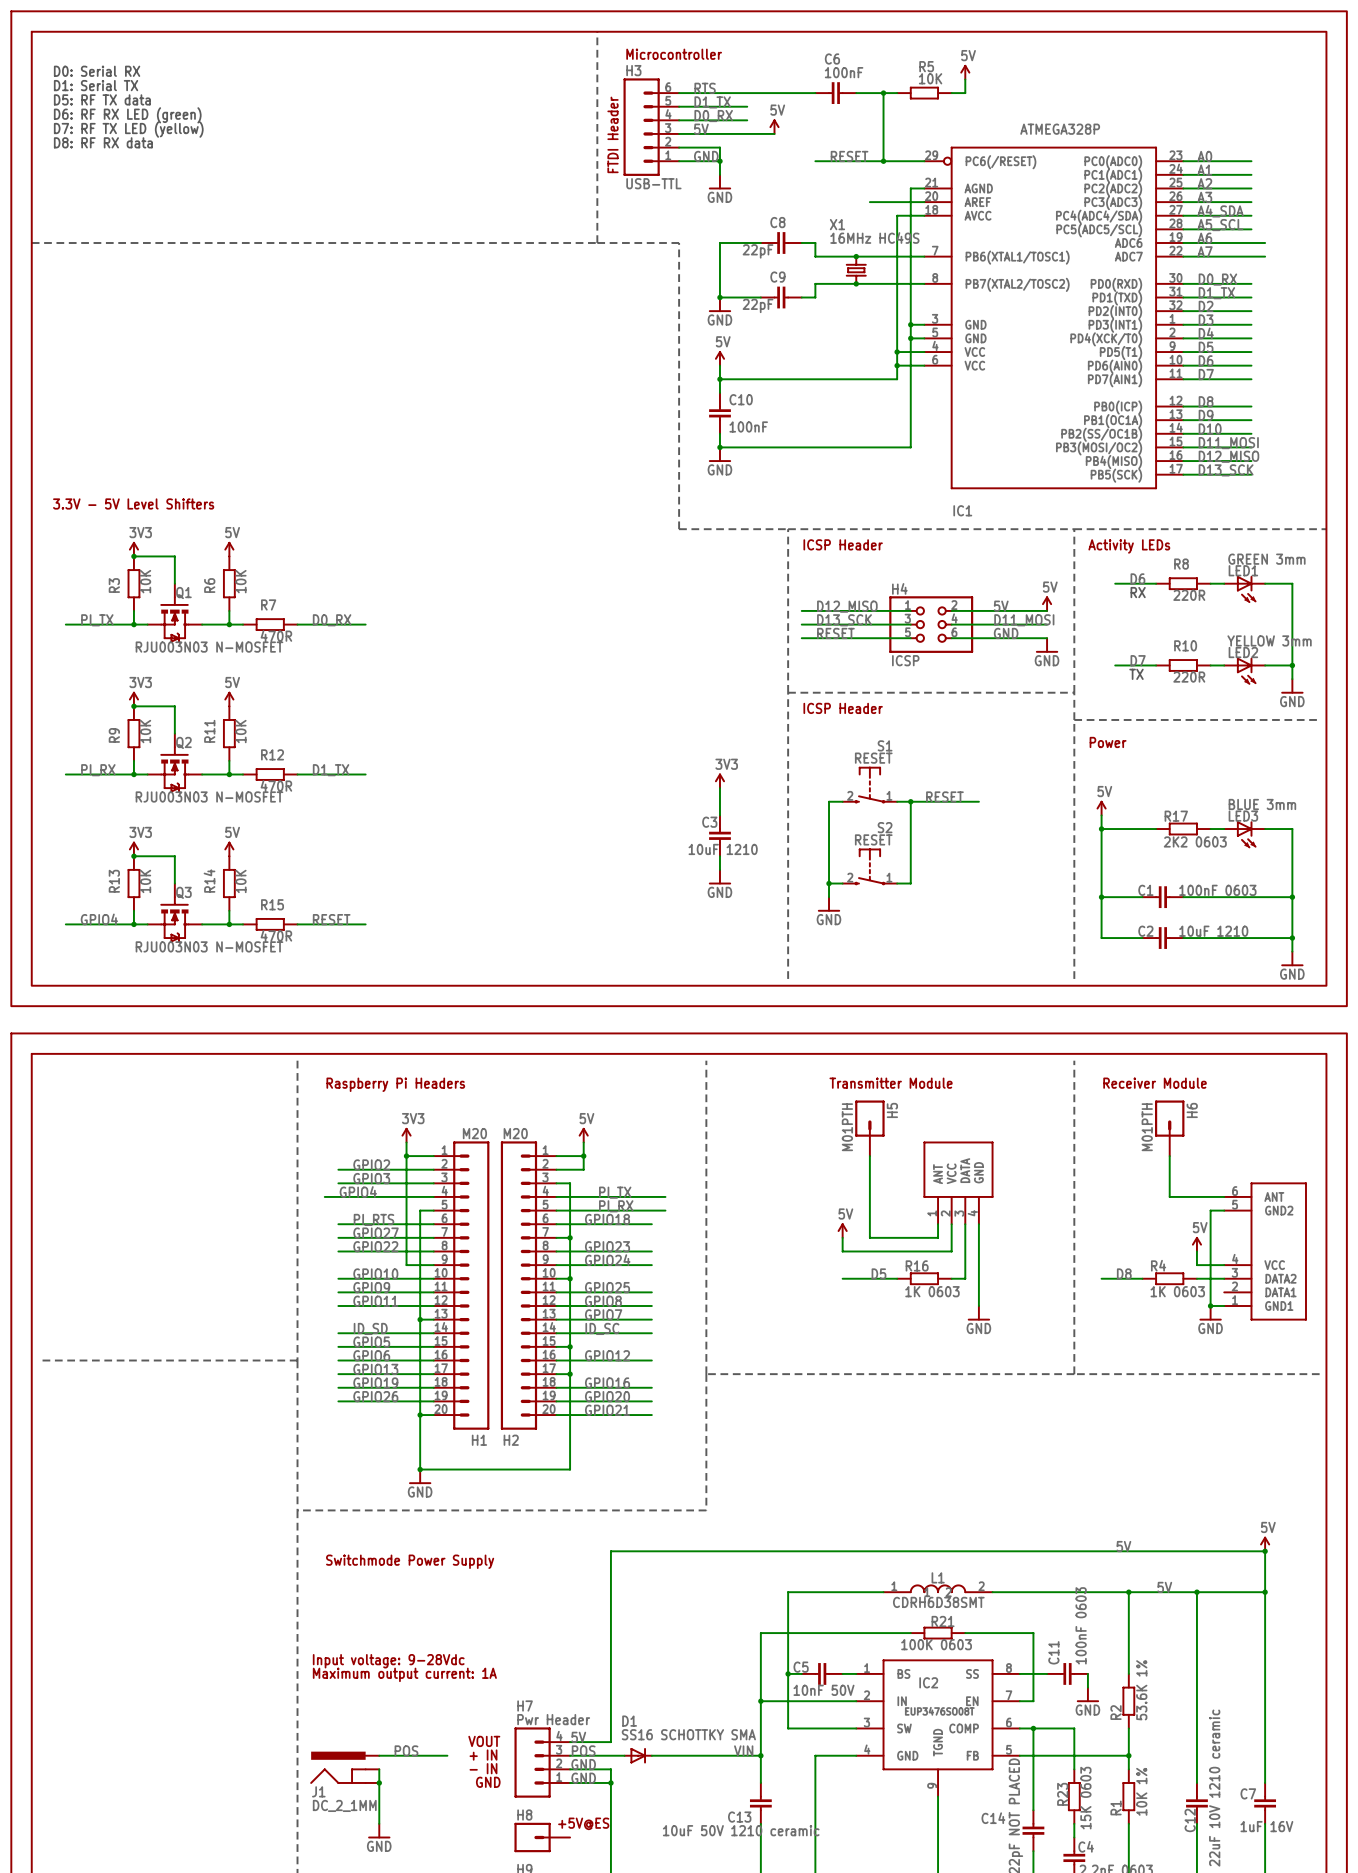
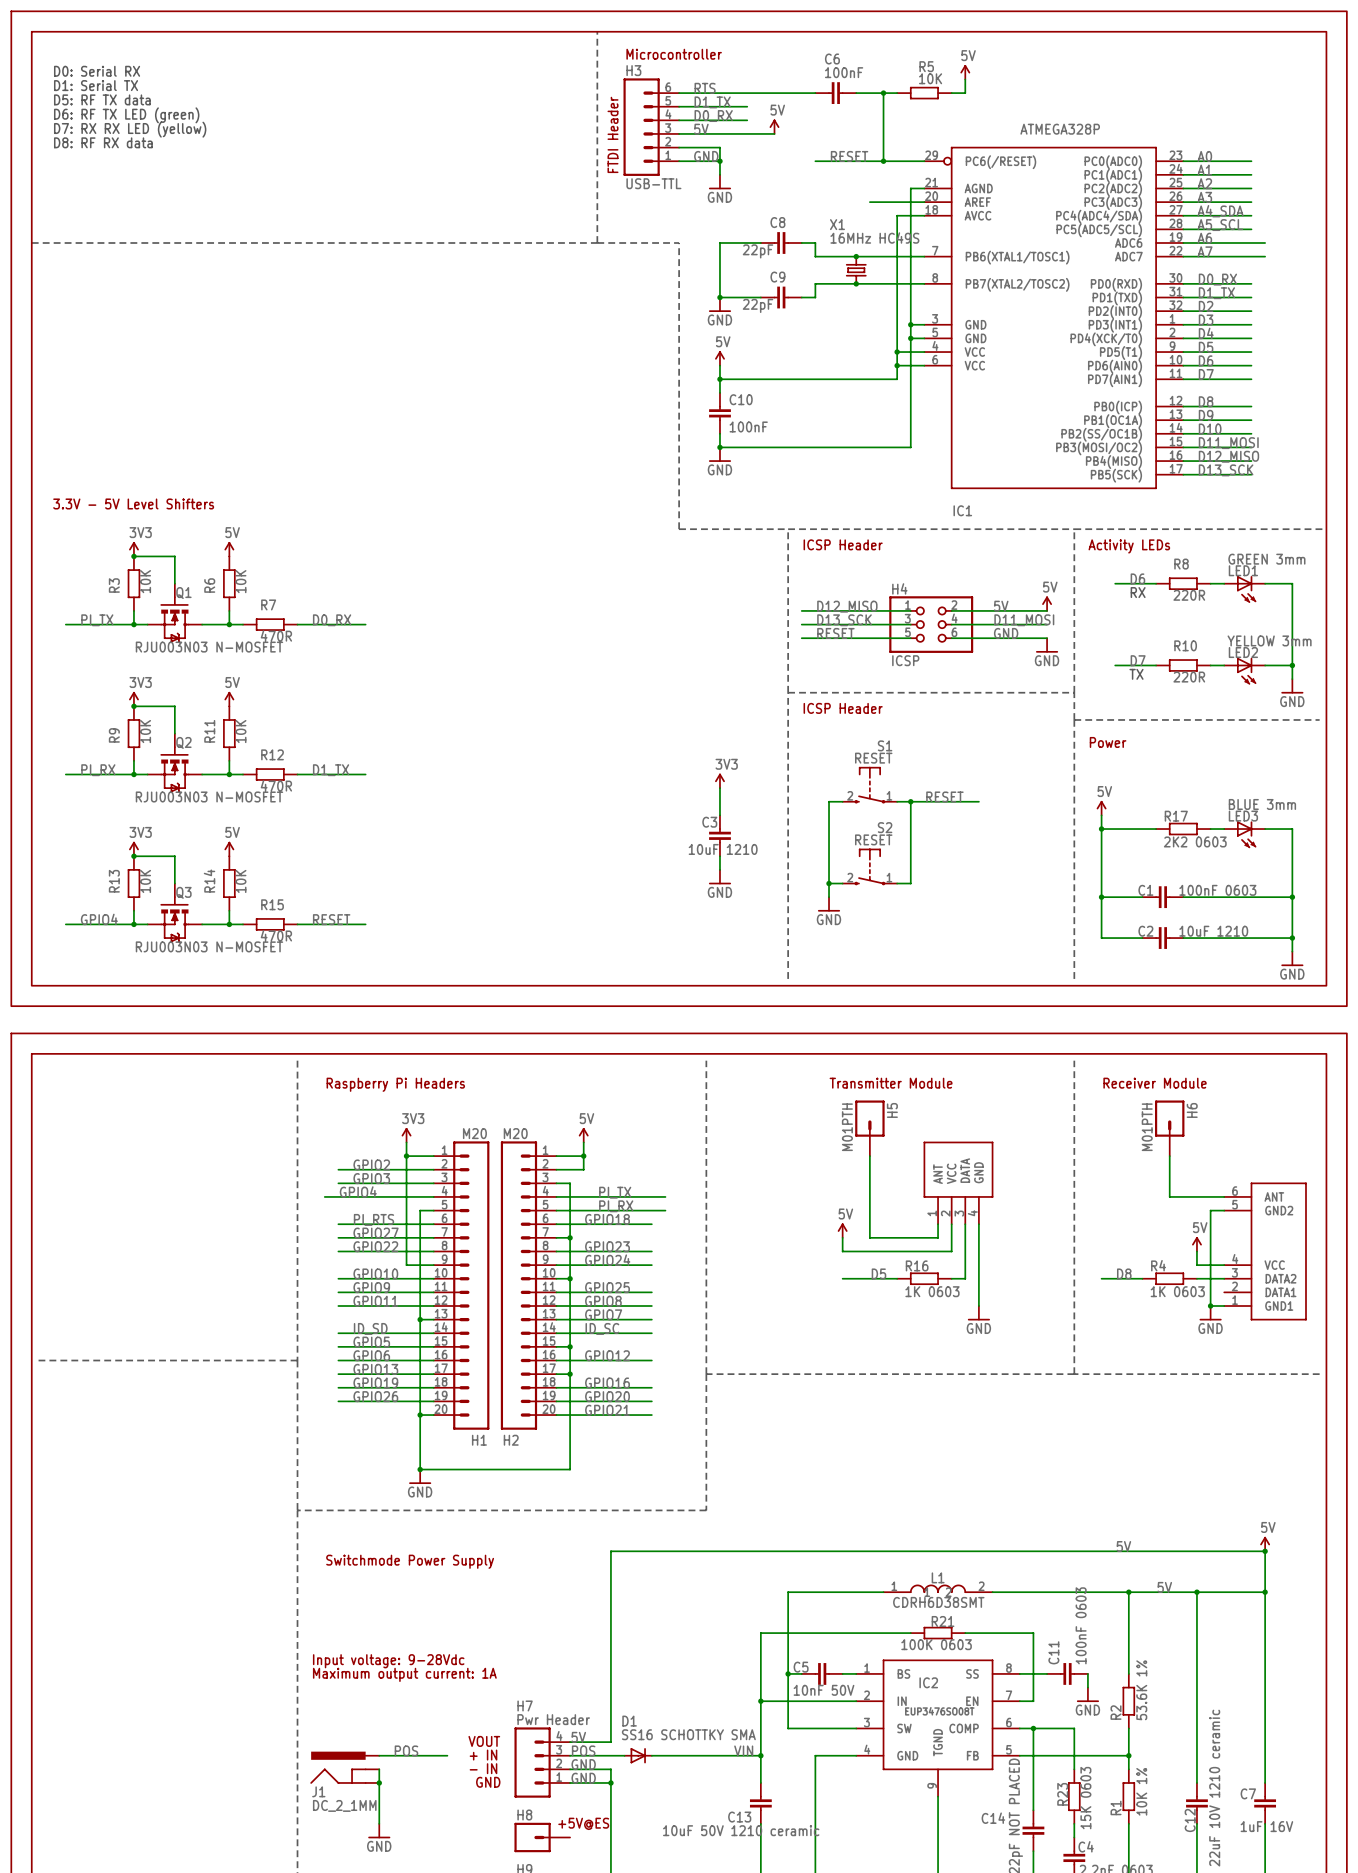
text: D6: RF RX LED (green) (127, 115) -> D6: RF TX LED (green) (126, 115)
text: D7: RF TX LED (yellow) (128, 129) -> D7: RX RX LED (yellow) (130, 129)

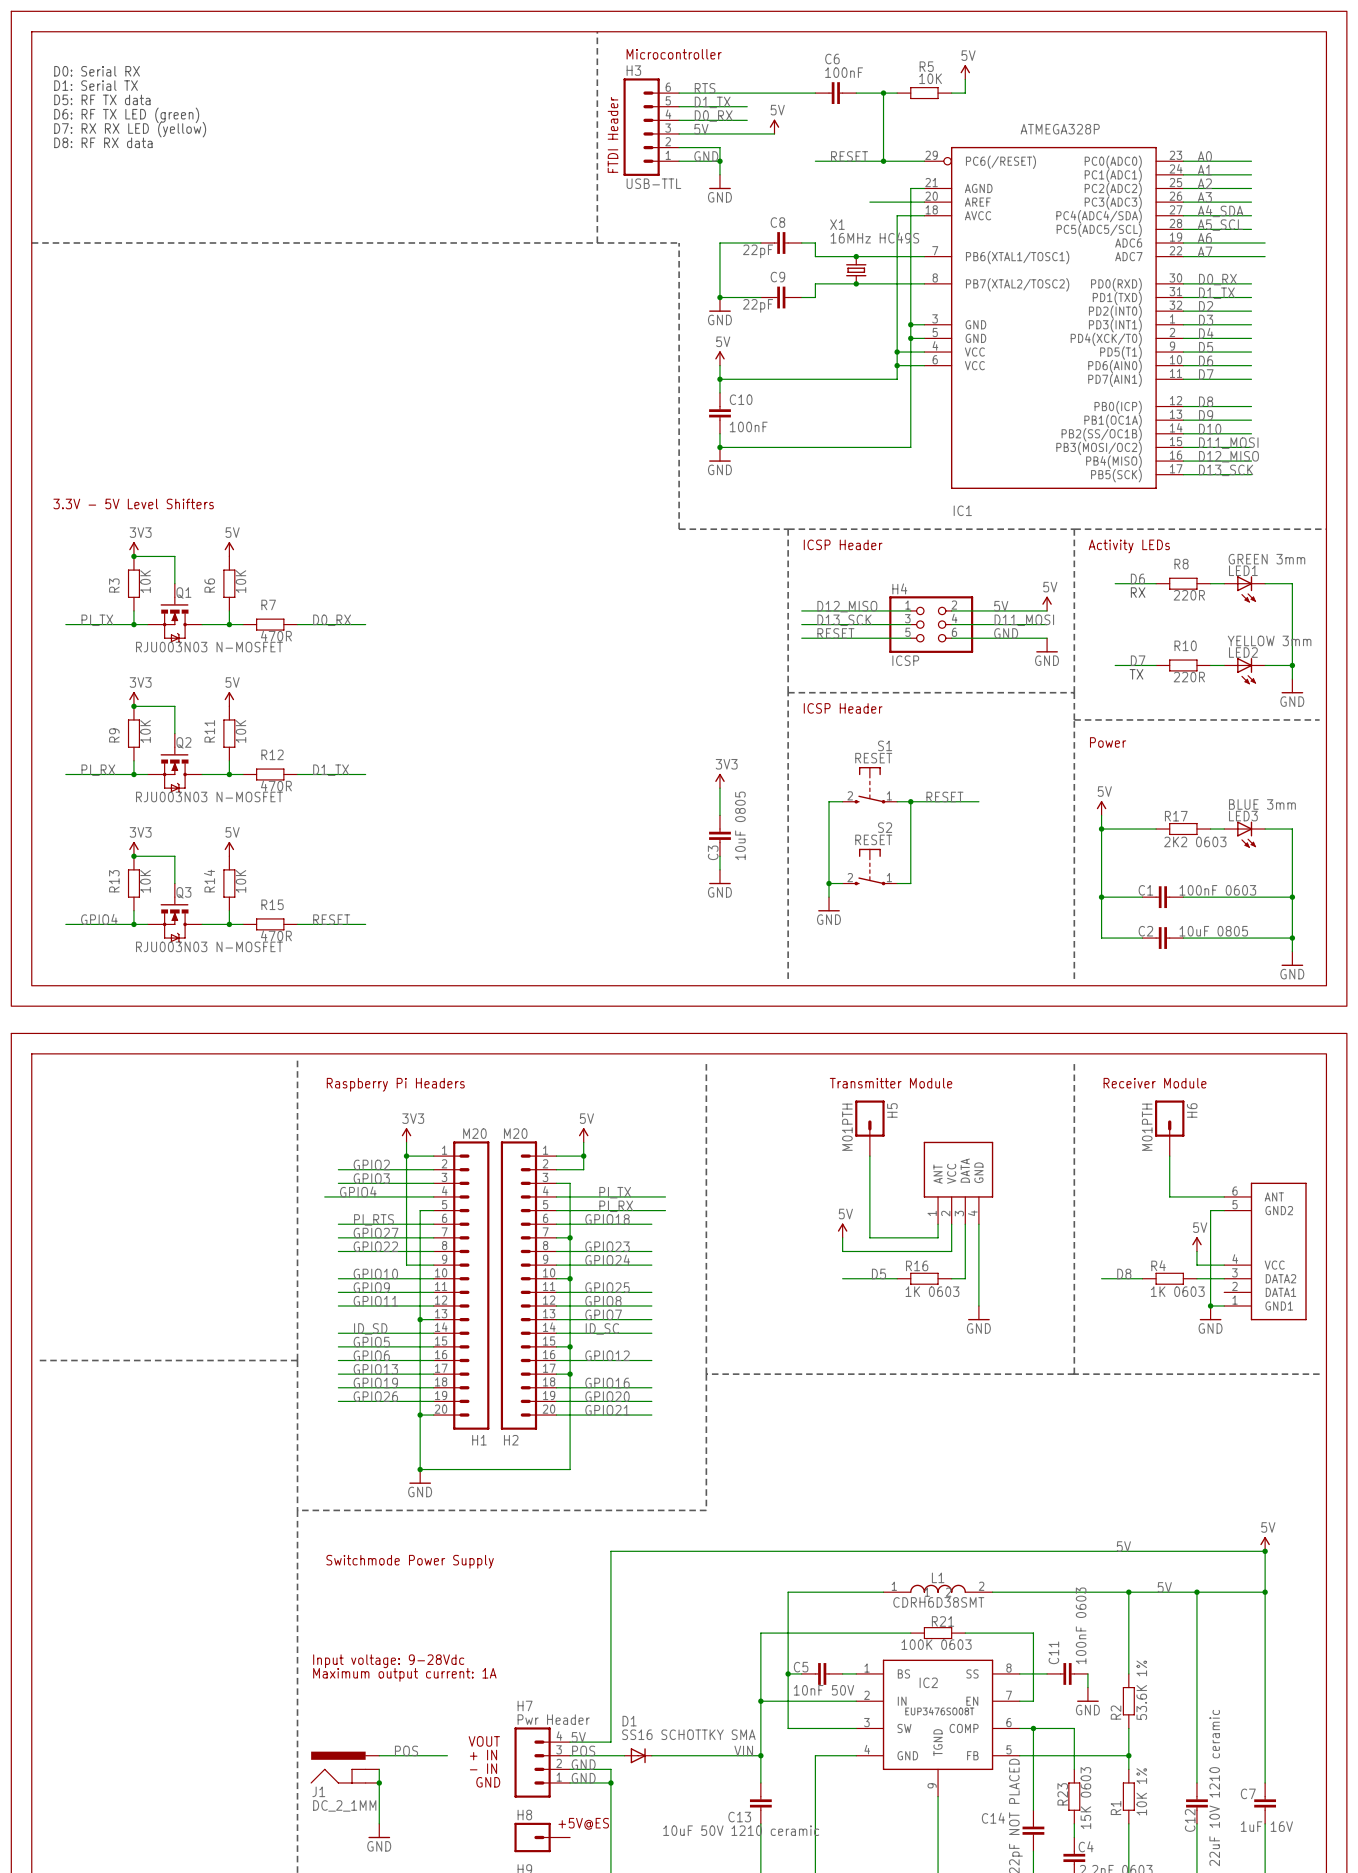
C3 name rotation: 0° (709, 822) -> 90° counterclockwise (713, 852)
C3 name position: C3 (709, 822) -> C3 (713, 852)
C3 value: 10uF 1210 (723, 849) -> 10uF 0805 (740, 825)
C2 value: 10uF 1210 (1213, 931) -> 10uF 0805 (1213, 931)

